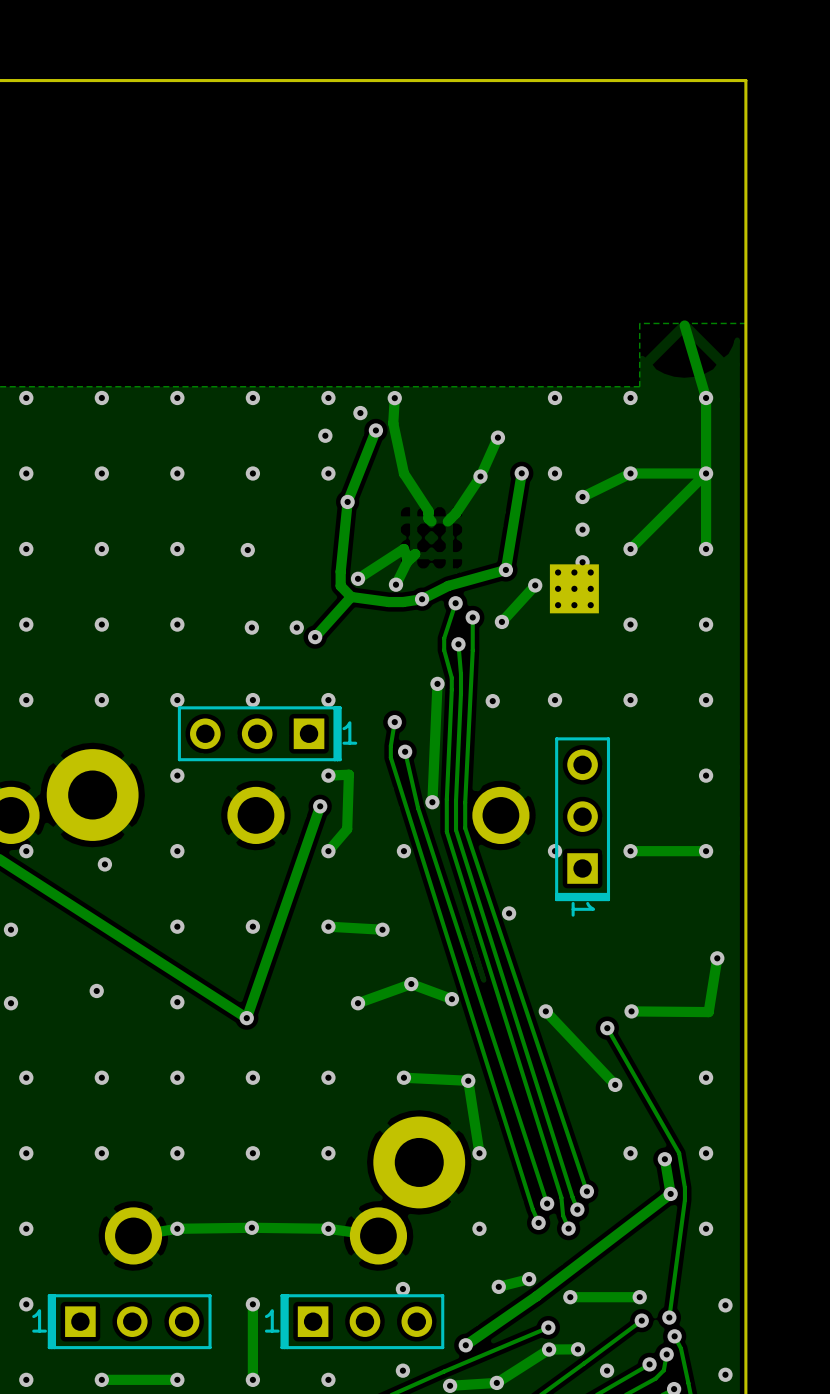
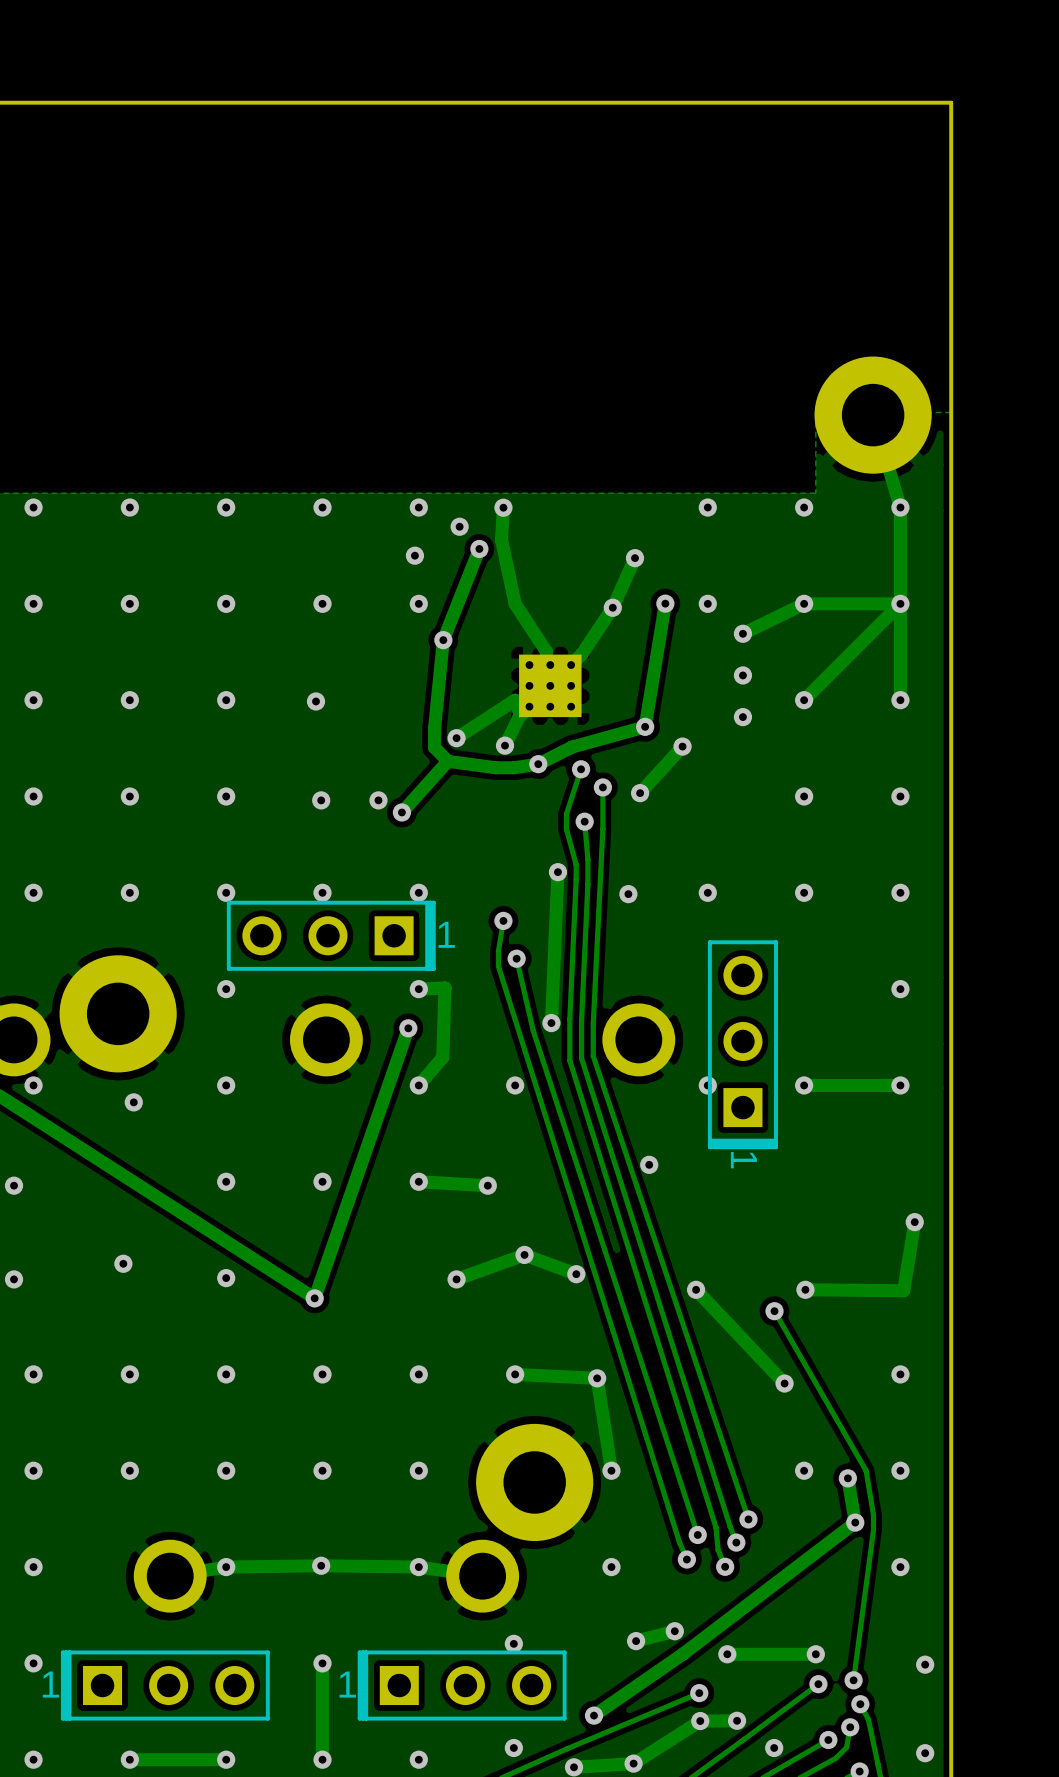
part: none -> (873, 415)
part position: (574, 588) -> (550, 685)

